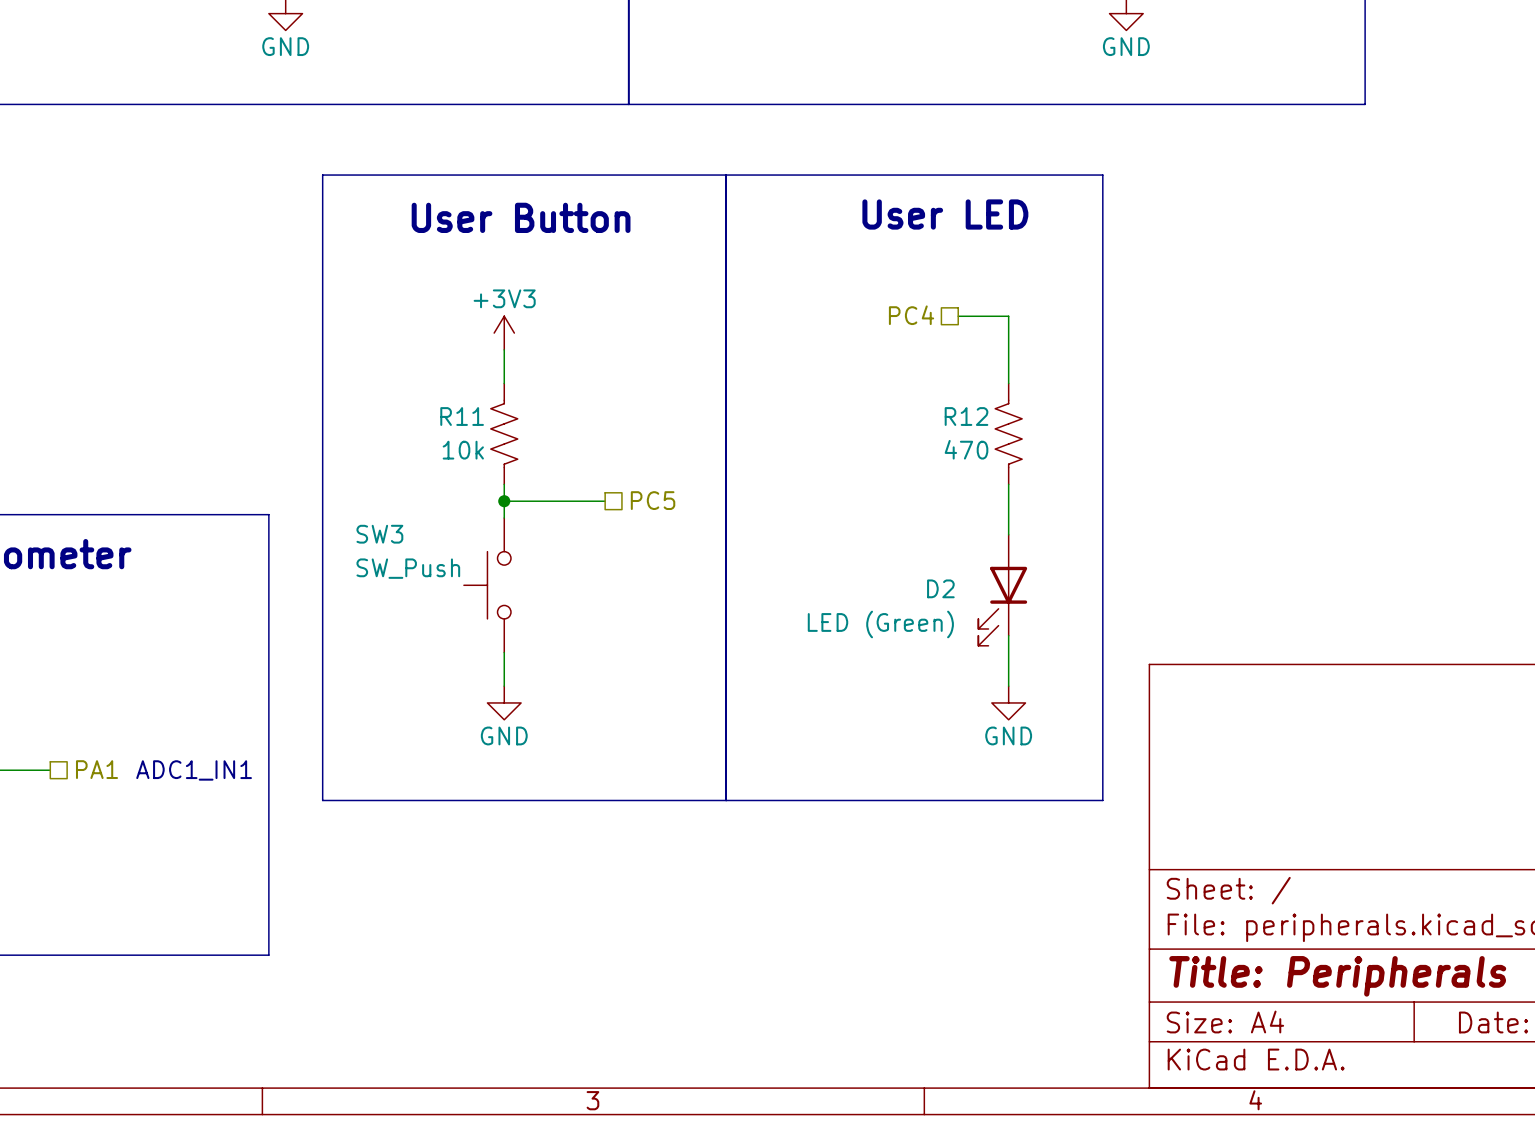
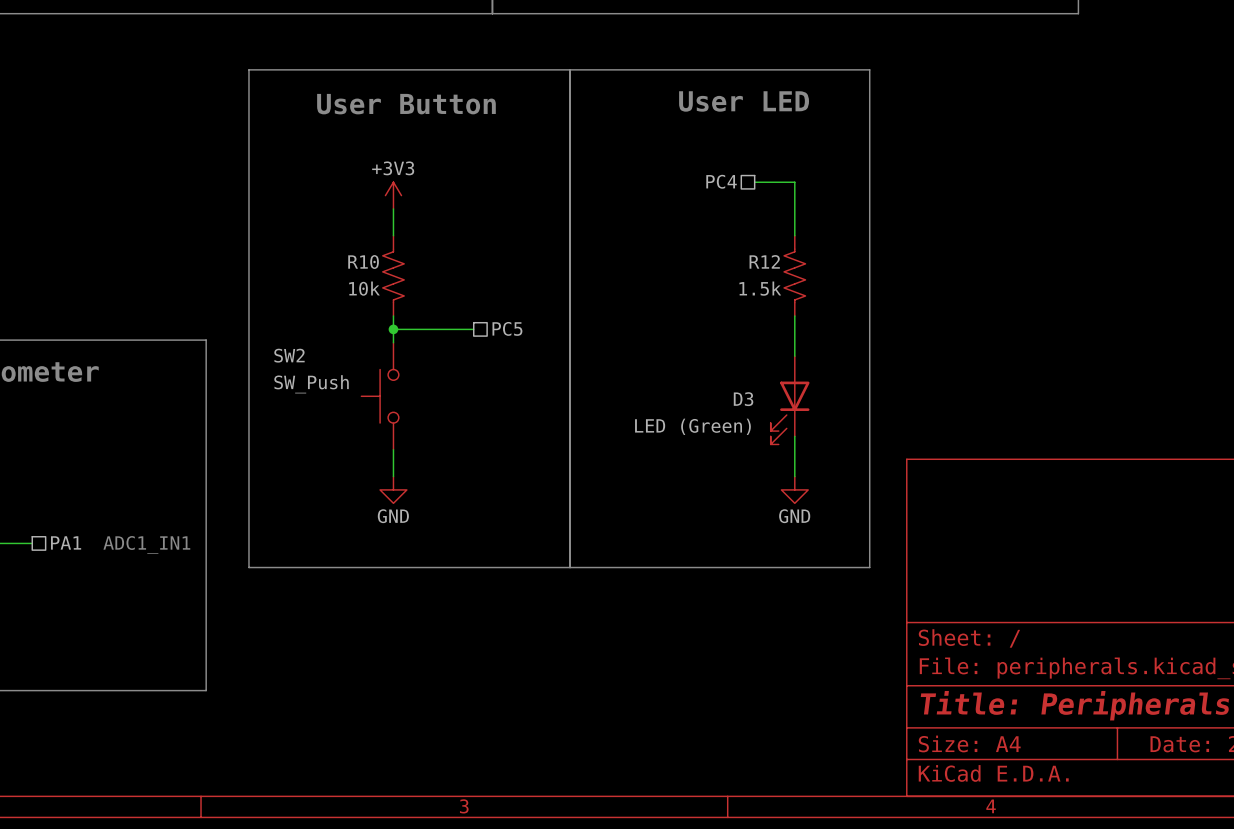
R11 name: R11 (462, 416) -> R10 (363, 262)
R12 value: 470 (966, 449) -> 1.5k (760, 288)
SW3 name: SW3 (379, 534) -> SW2 (289, 355)
D2 name: D2 (940, 588) -> D3 (743, 399)

